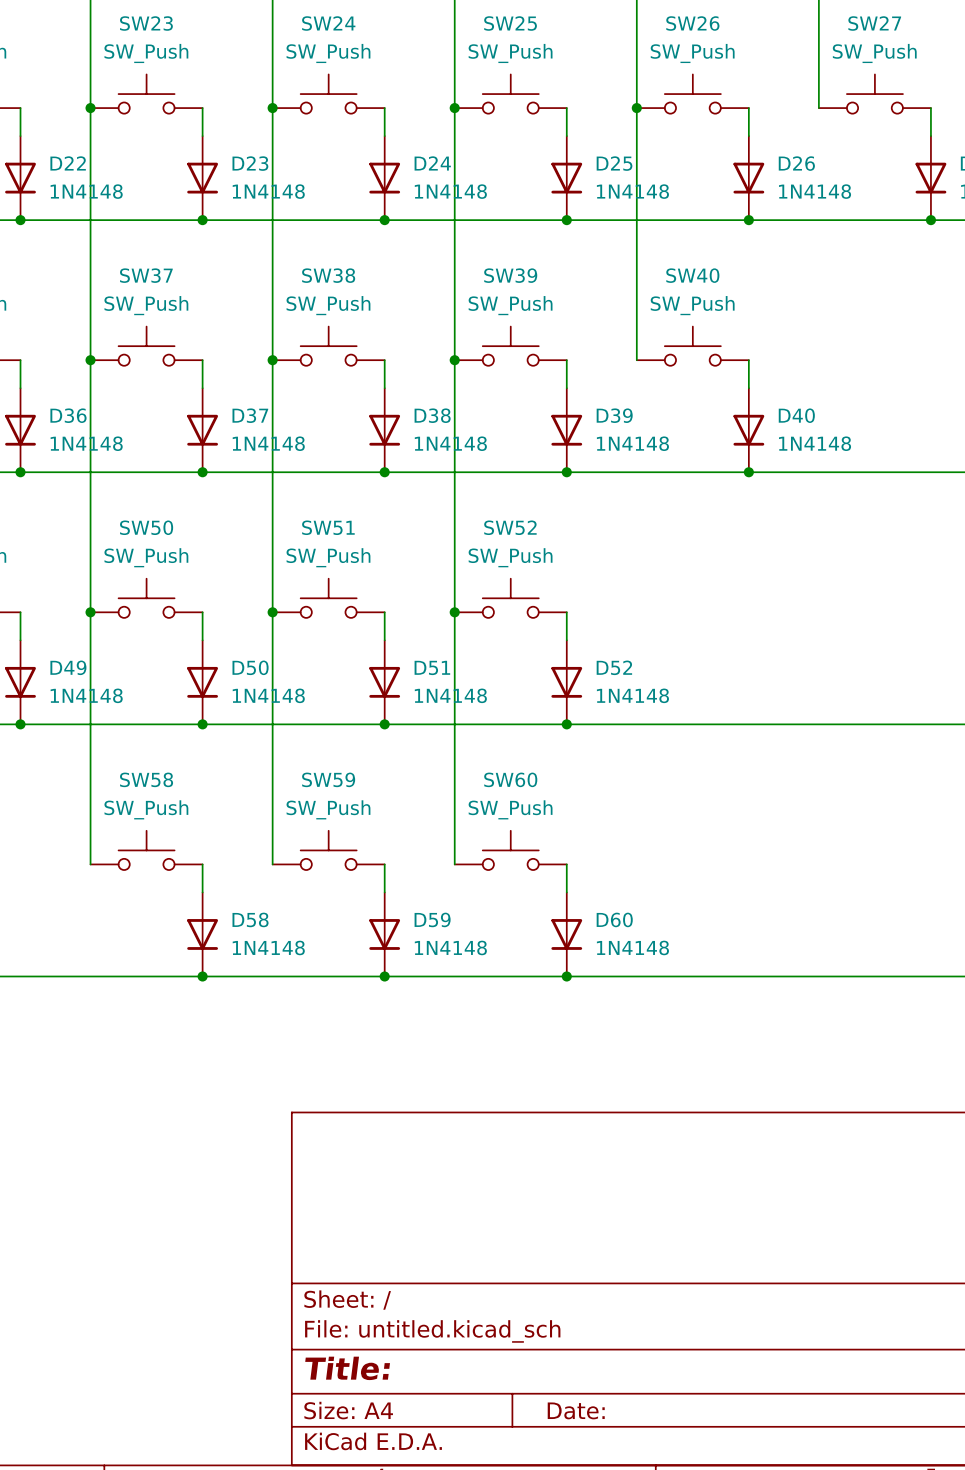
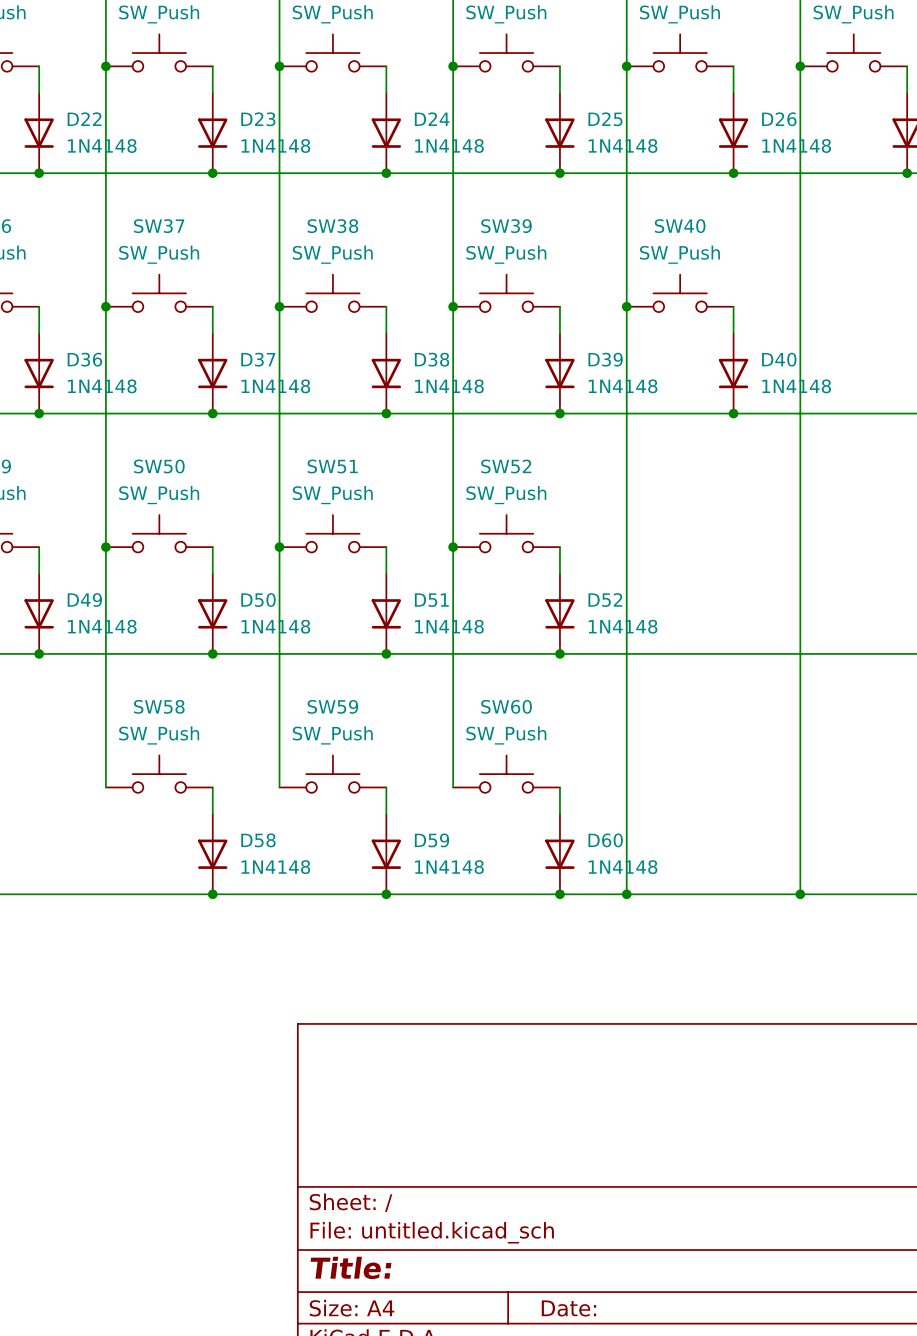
wire: none -> (800, 66) (800, 894)
junction: none -> (800, 66)
wire: none -> (626, 306) (626, 894)
junction: none -> (626, 306)
junction: none -> (626, 894)
junction: none -> (800, 894)

